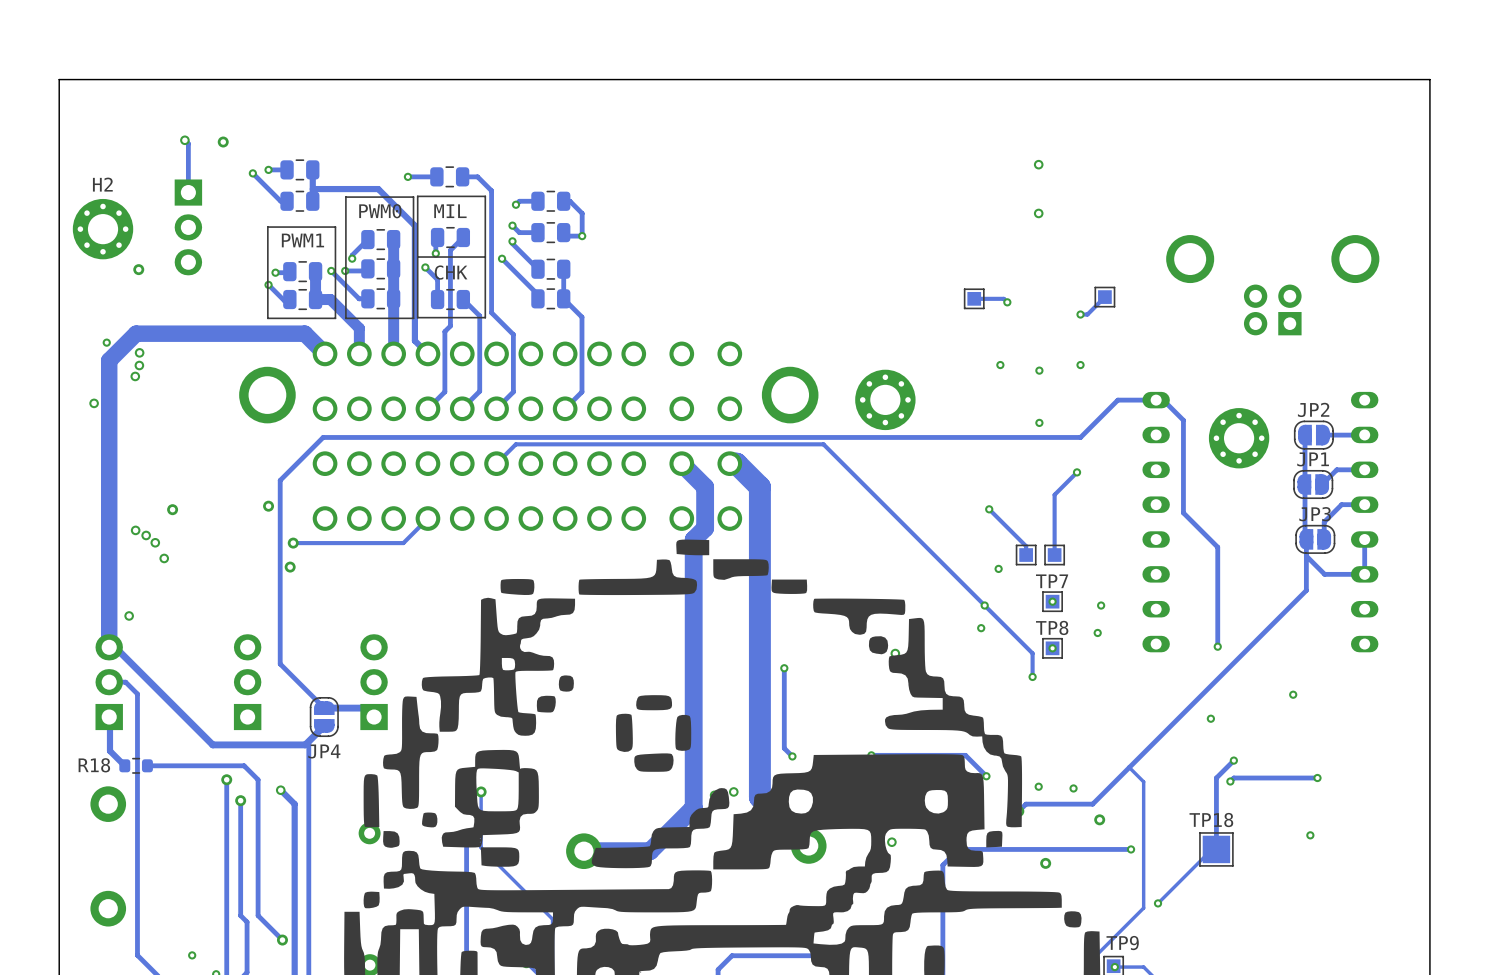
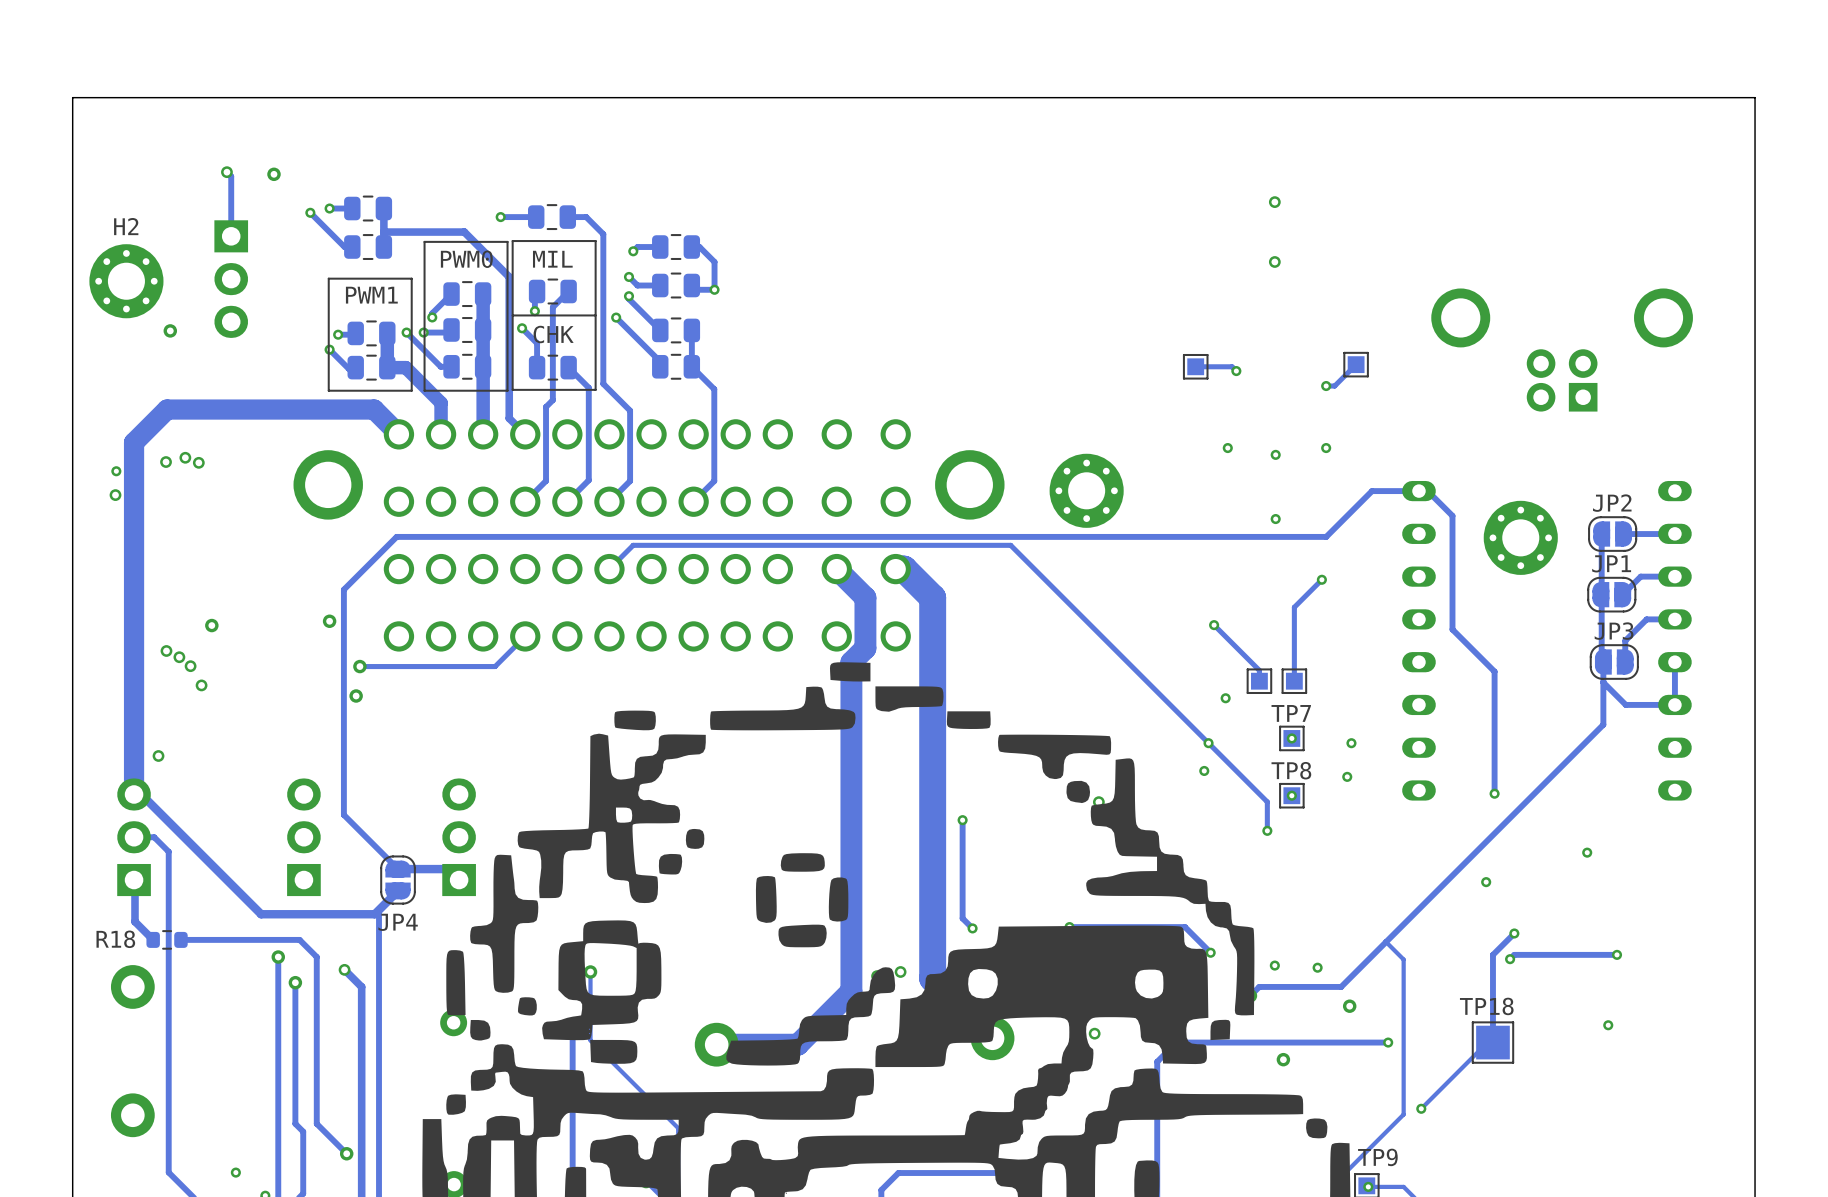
via position: (106, 342) -> (116, 471)
via: (139, 352) -> none
via: (139, 365) -> none
via: none -> (185, 457)
via: none -> (198, 462)

